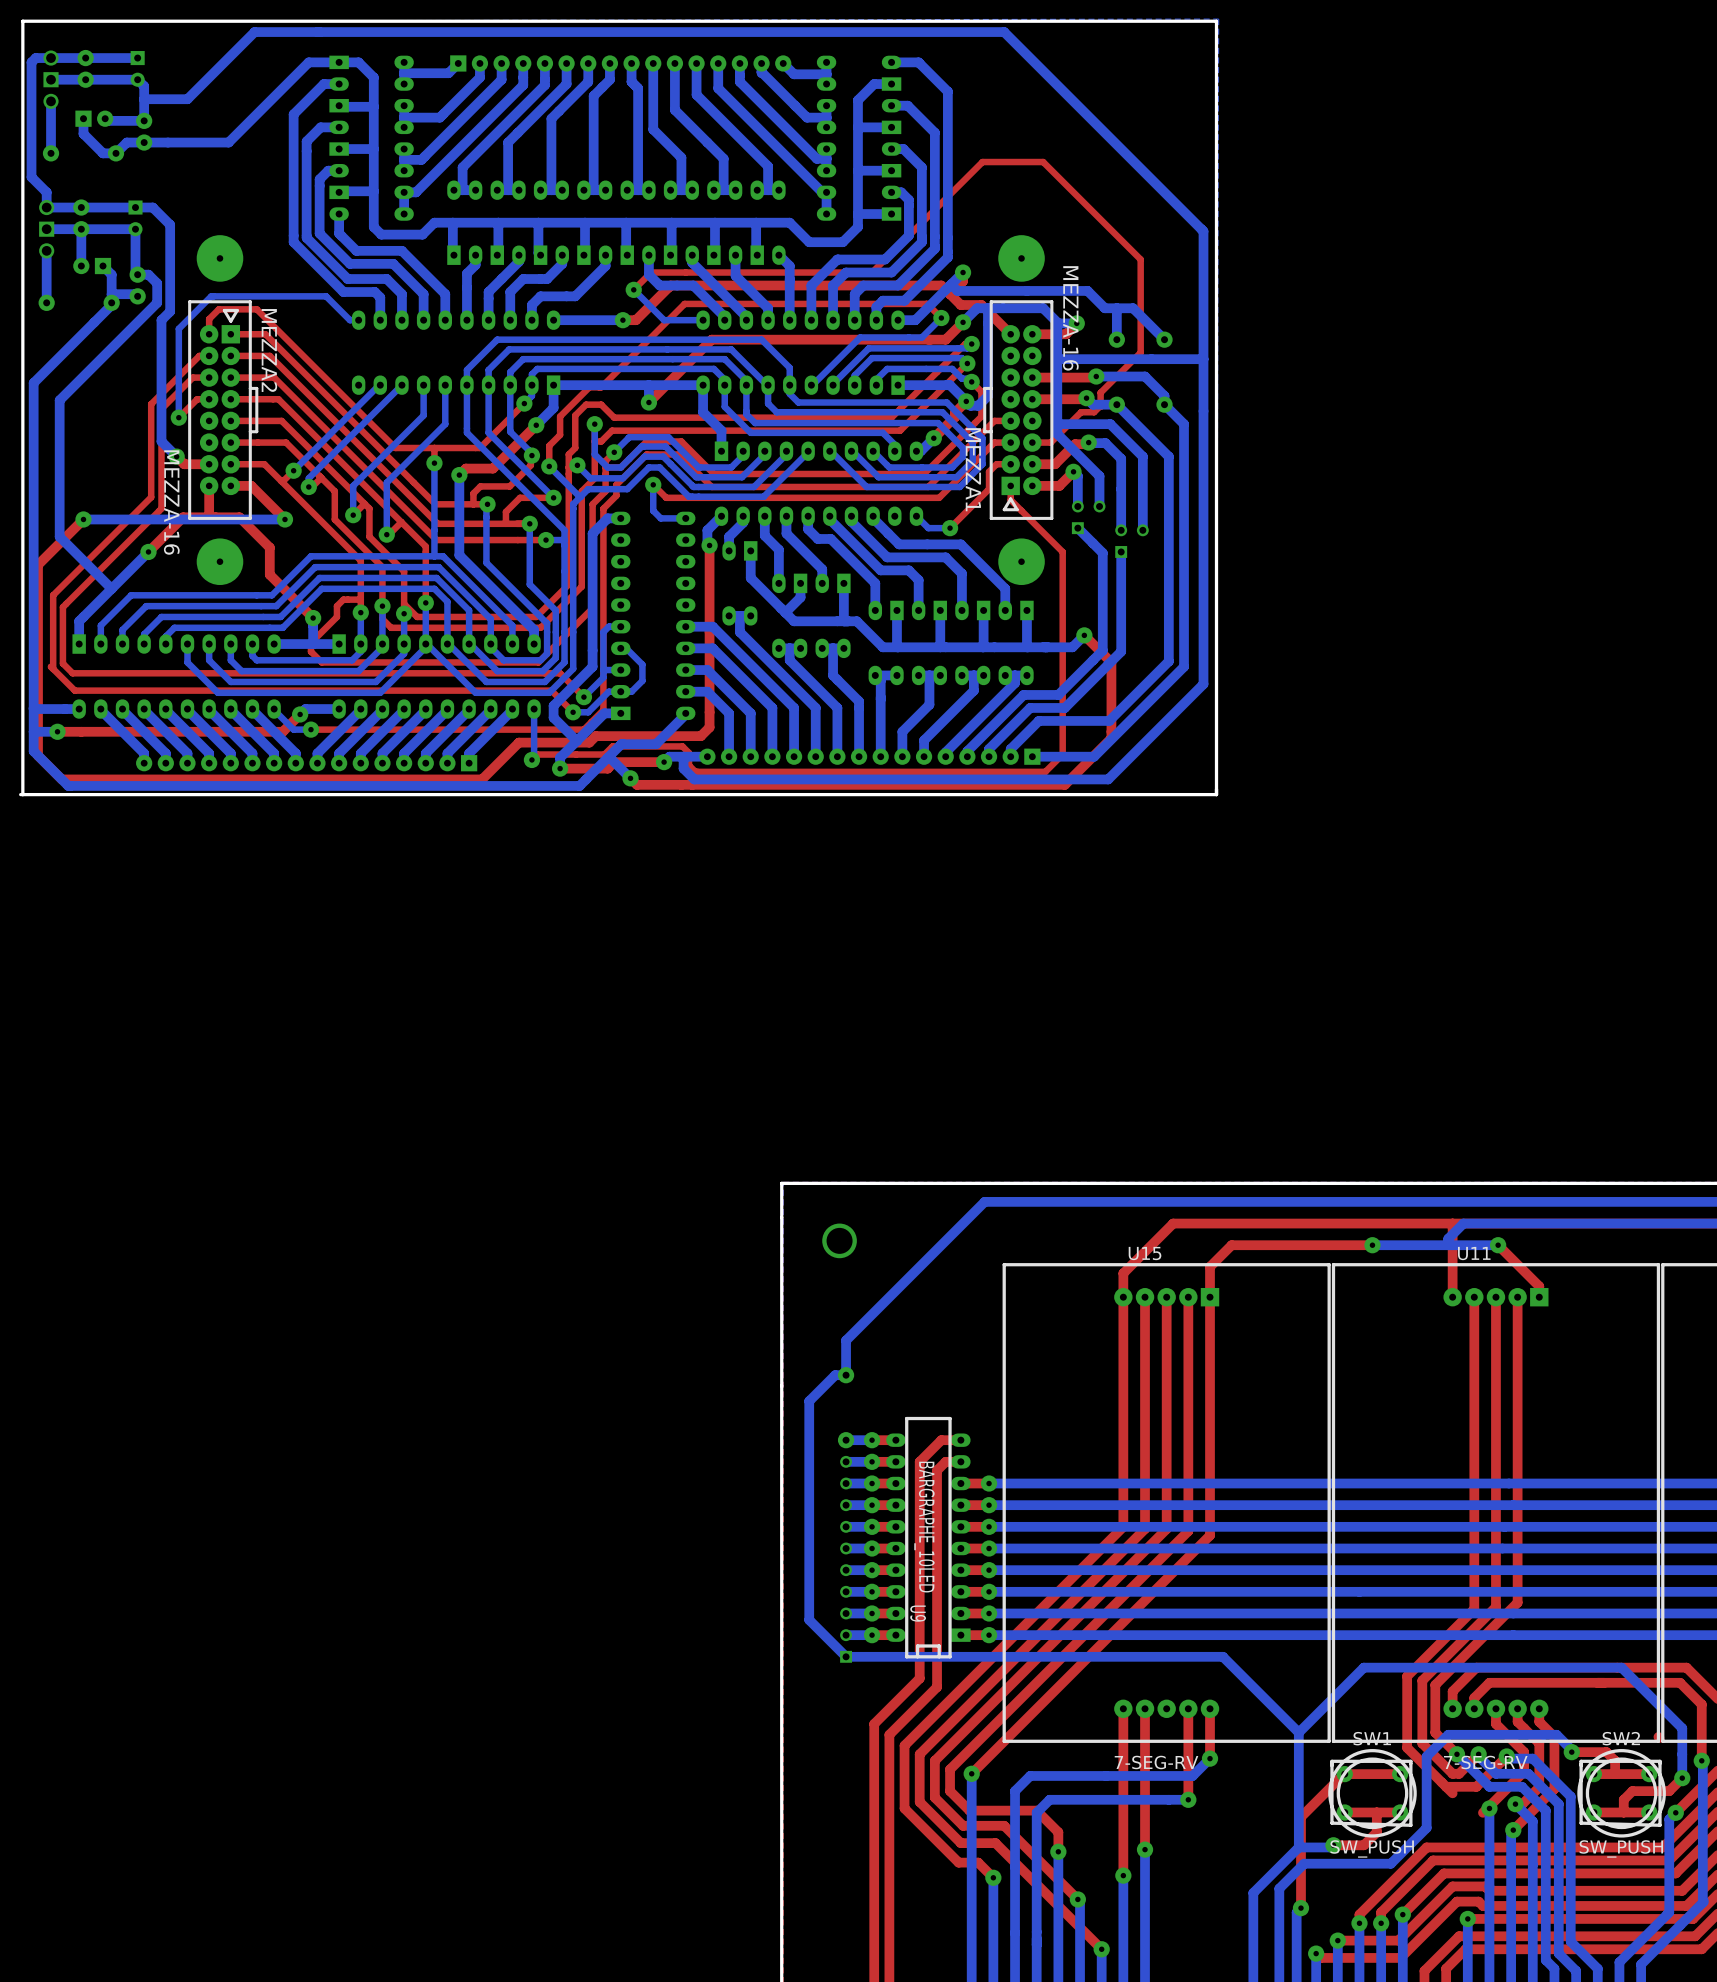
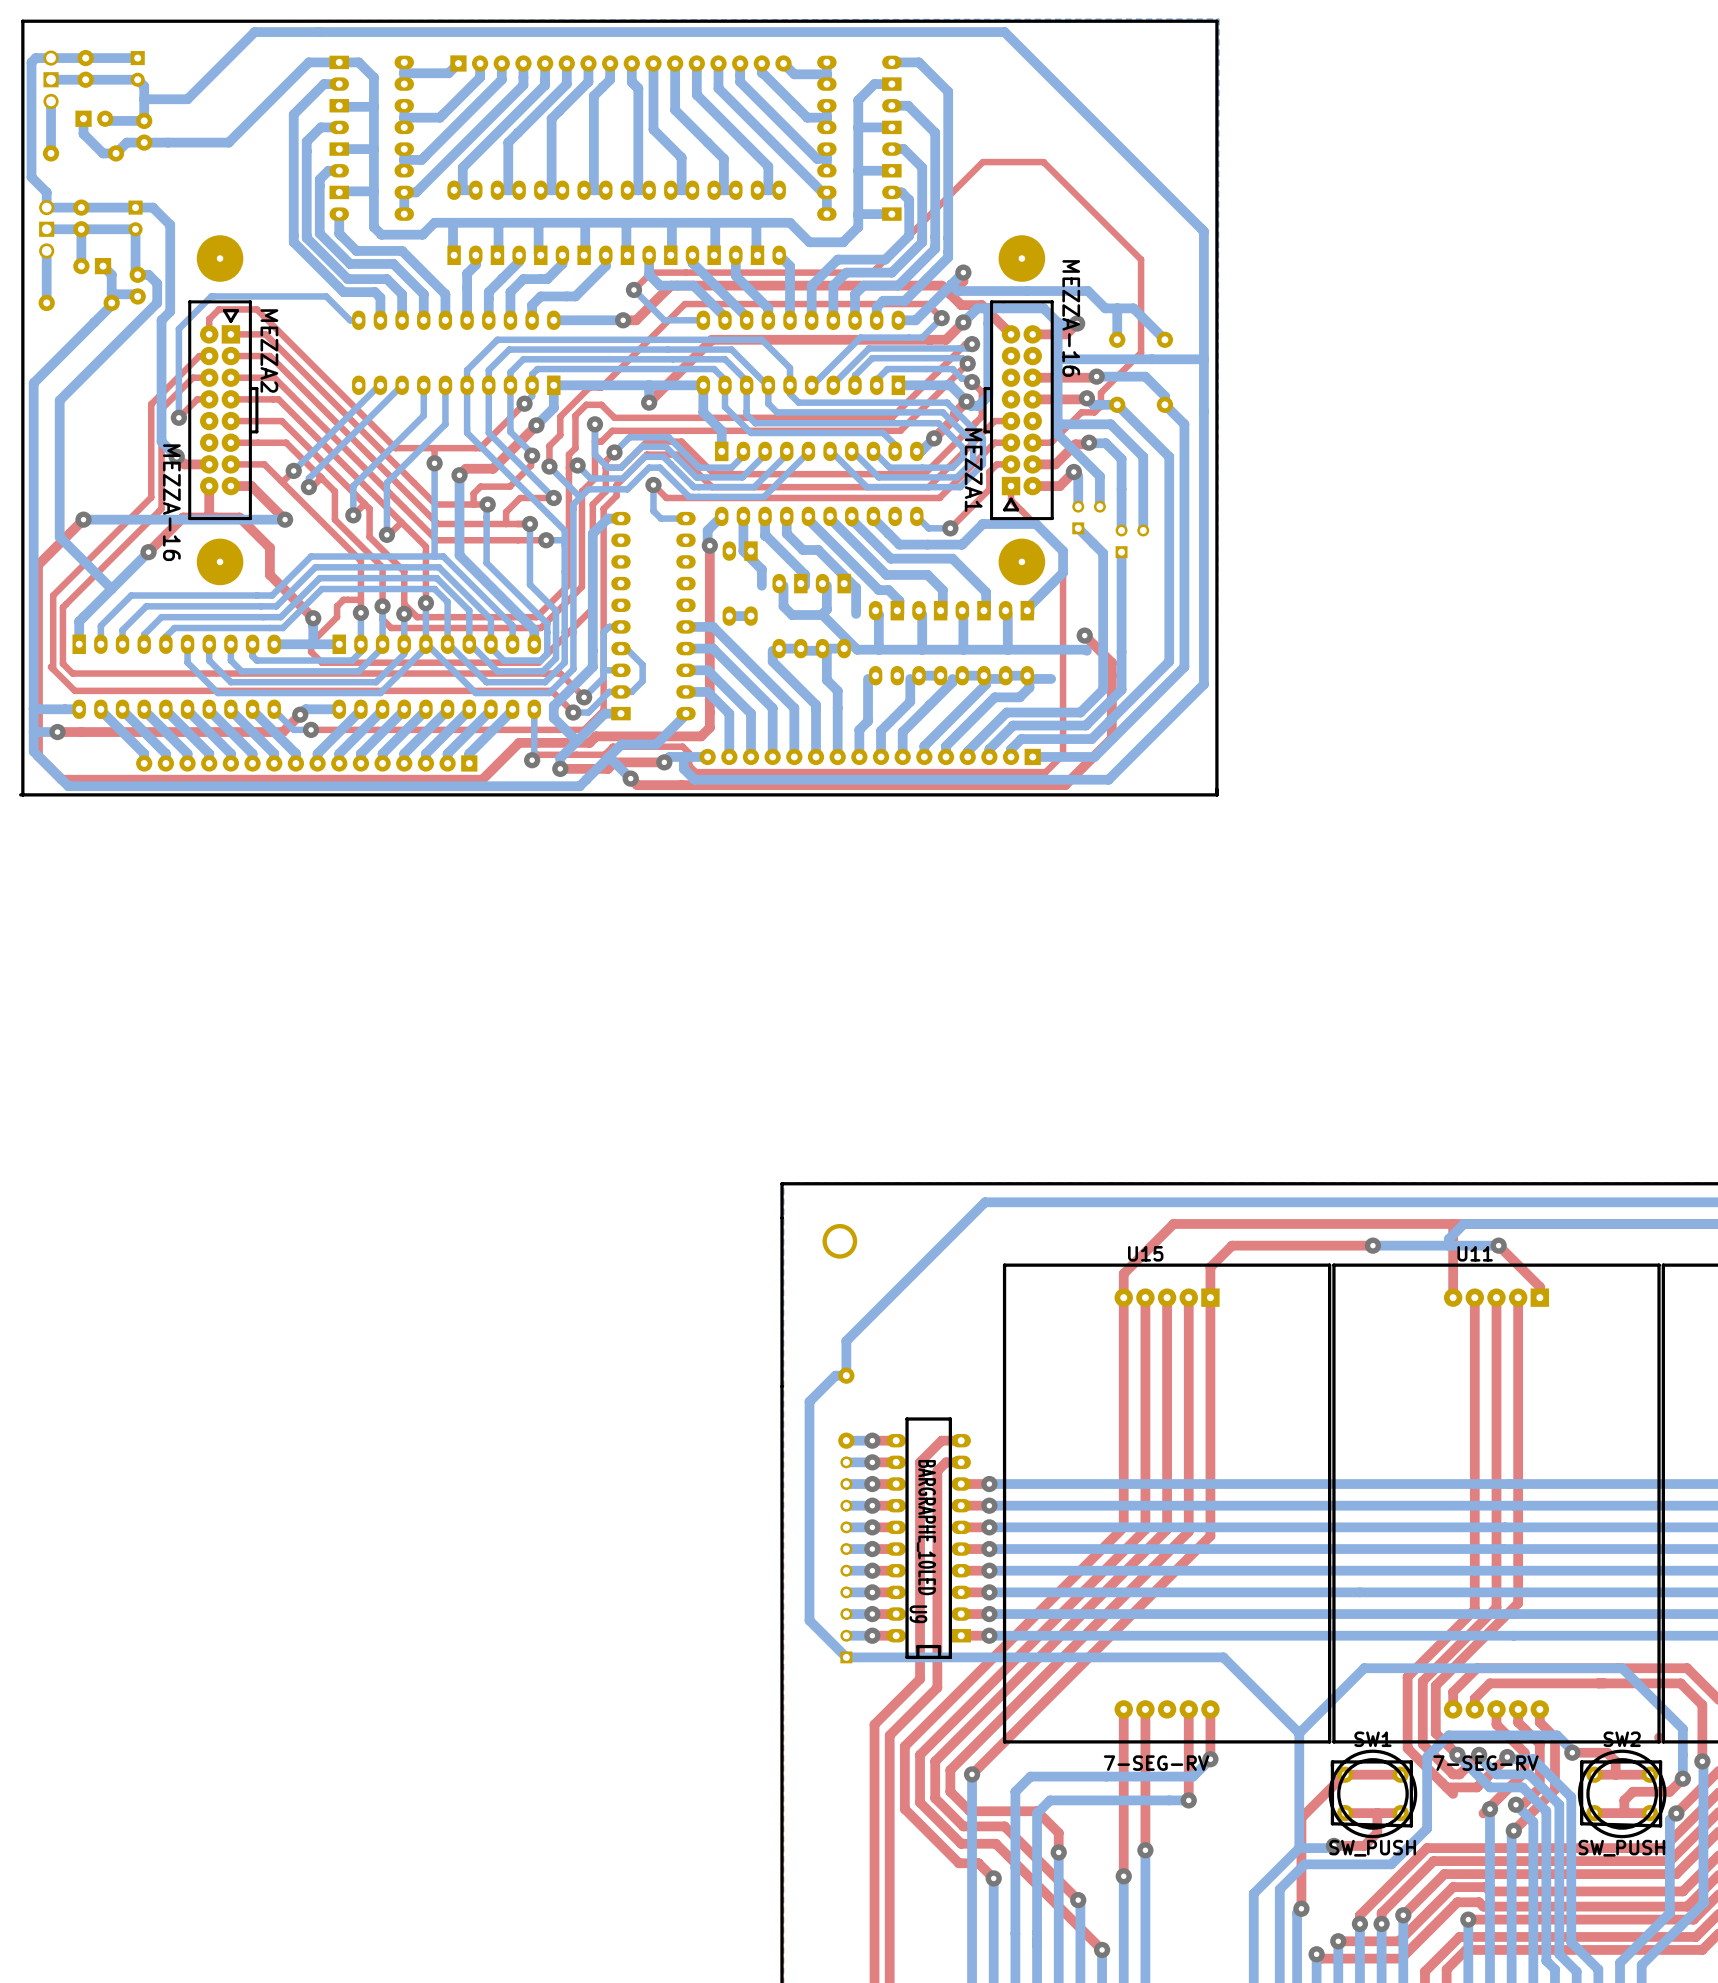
bottom track: none -> (830, 518) (886, 574) (927, 574) (942, 590) (942, 613)
bottom track: (808, 519) (808, 529) (817, 538) (830, 538) (875, 583) (875, 610) -> (808, 519) (878, 590) (888, 590) (899, 600) (899, 613)
bottom track: (829, 519) (880, 570) (908, 570) (918, 580) (918, 610) -> none
bottom track: none -> (851, 519) (890, 558) (952, 558) (986, 592) (986, 613)
bottom track: (851, 521) (887, 557) (945, 557) (961, 573) (961, 610) -> none
bottom track: (743, 522) (729, 536) (729, 550) -> (743, 522) (743, 551) (761, 569) (761, 585)
bottom track: (764, 535) (778, 549) (778, 583) -> (765, 535) (805, 574) (805, 585)
bottom track: (960, 544) (1005, 588) (1005, 610) -> (961, 544) (982, 523) (1035, 523) (1063, 551) (1063, 572) (1029, 606) (1029, 613)
bottom track: (802, 549) (822, 569) (822, 583) -> (803, 550) (818, 550) (856, 587) (856, 613)
bottom track: (750, 550) (750, 577) (794, 621) (856, 621) (882, 647) (1072, 647) (1084, 635) -> none
bottom track: (800, 583) (800, 597) (785, 612) -> none
bottom track: (843, 583) (843, 621) -> none
bottom track: none -> (783, 585) (783, 606) (792, 615) (822, 615) (857, 649) (1086, 650)
bottom track: none -> (826, 585) (826, 609) (821, 615)
bottom track: (896, 610) (898, 647) -> none
bottom track: (940, 610) (940, 647) -> none
bottom track: (983, 610) (983, 647) -> none
bottom track: (1026, 610) (1026, 647) -> none
bottom track: none -> (877, 613) (878, 649)
bottom track: none -> (921, 613) (922, 649)
bottom track: none -> (964, 613) (963, 649)
bottom track: none -> (1007, 613) (1007, 649)
bottom track: (739, 615) (739, 632) (815, 707) -> (772, 650) (772, 661) (816, 704) (816, 708)
bottom track: (789, 648) (789, 660) (837, 707) -> (805, 650) (826, 650) (826, 680) (837, 690) (837, 708)
bottom track: (833, 648) (833, 675) (859, 701) (859, 729) -> (868, 678) (868, 721) (859, 729)
bottom track: (1102, 650) (1058, 694) (1023, 694) (1006, 712) -> (1103, 650) (1103, 689) (1080, 712) (1006, 712)
bottom track: (1121, 651) (1064, 707) (1030, 707) (1012, 725) -> (1121, 651) (1121, 689) (1085, 725) (1013, 725)
bottom track: (896, 675) (875, 675) (880, 680) (880, 730) -> (910, 678) (910, 701) (881, 730)
bottom track: (929, 675) (929, 704) -> (952, 678) (952, 682) (929, 704)
bottom track: (973, 675) (973, 690) (924, 740) (924, 745) -> (1007, 678) (986, 678) (986, 684) (924, 746)
bottom track: (1015, 675) (1015, 683) (945, 752) -> (1051, 678) (1029, 678) (1029, 687) (1019, 697) (994, 697) (946, 746) (946, 752)
bottom track: (1109, 720) (1038, 720) (1020, 738) -> (1109, 721) (1091, 739) (1021, 739)

